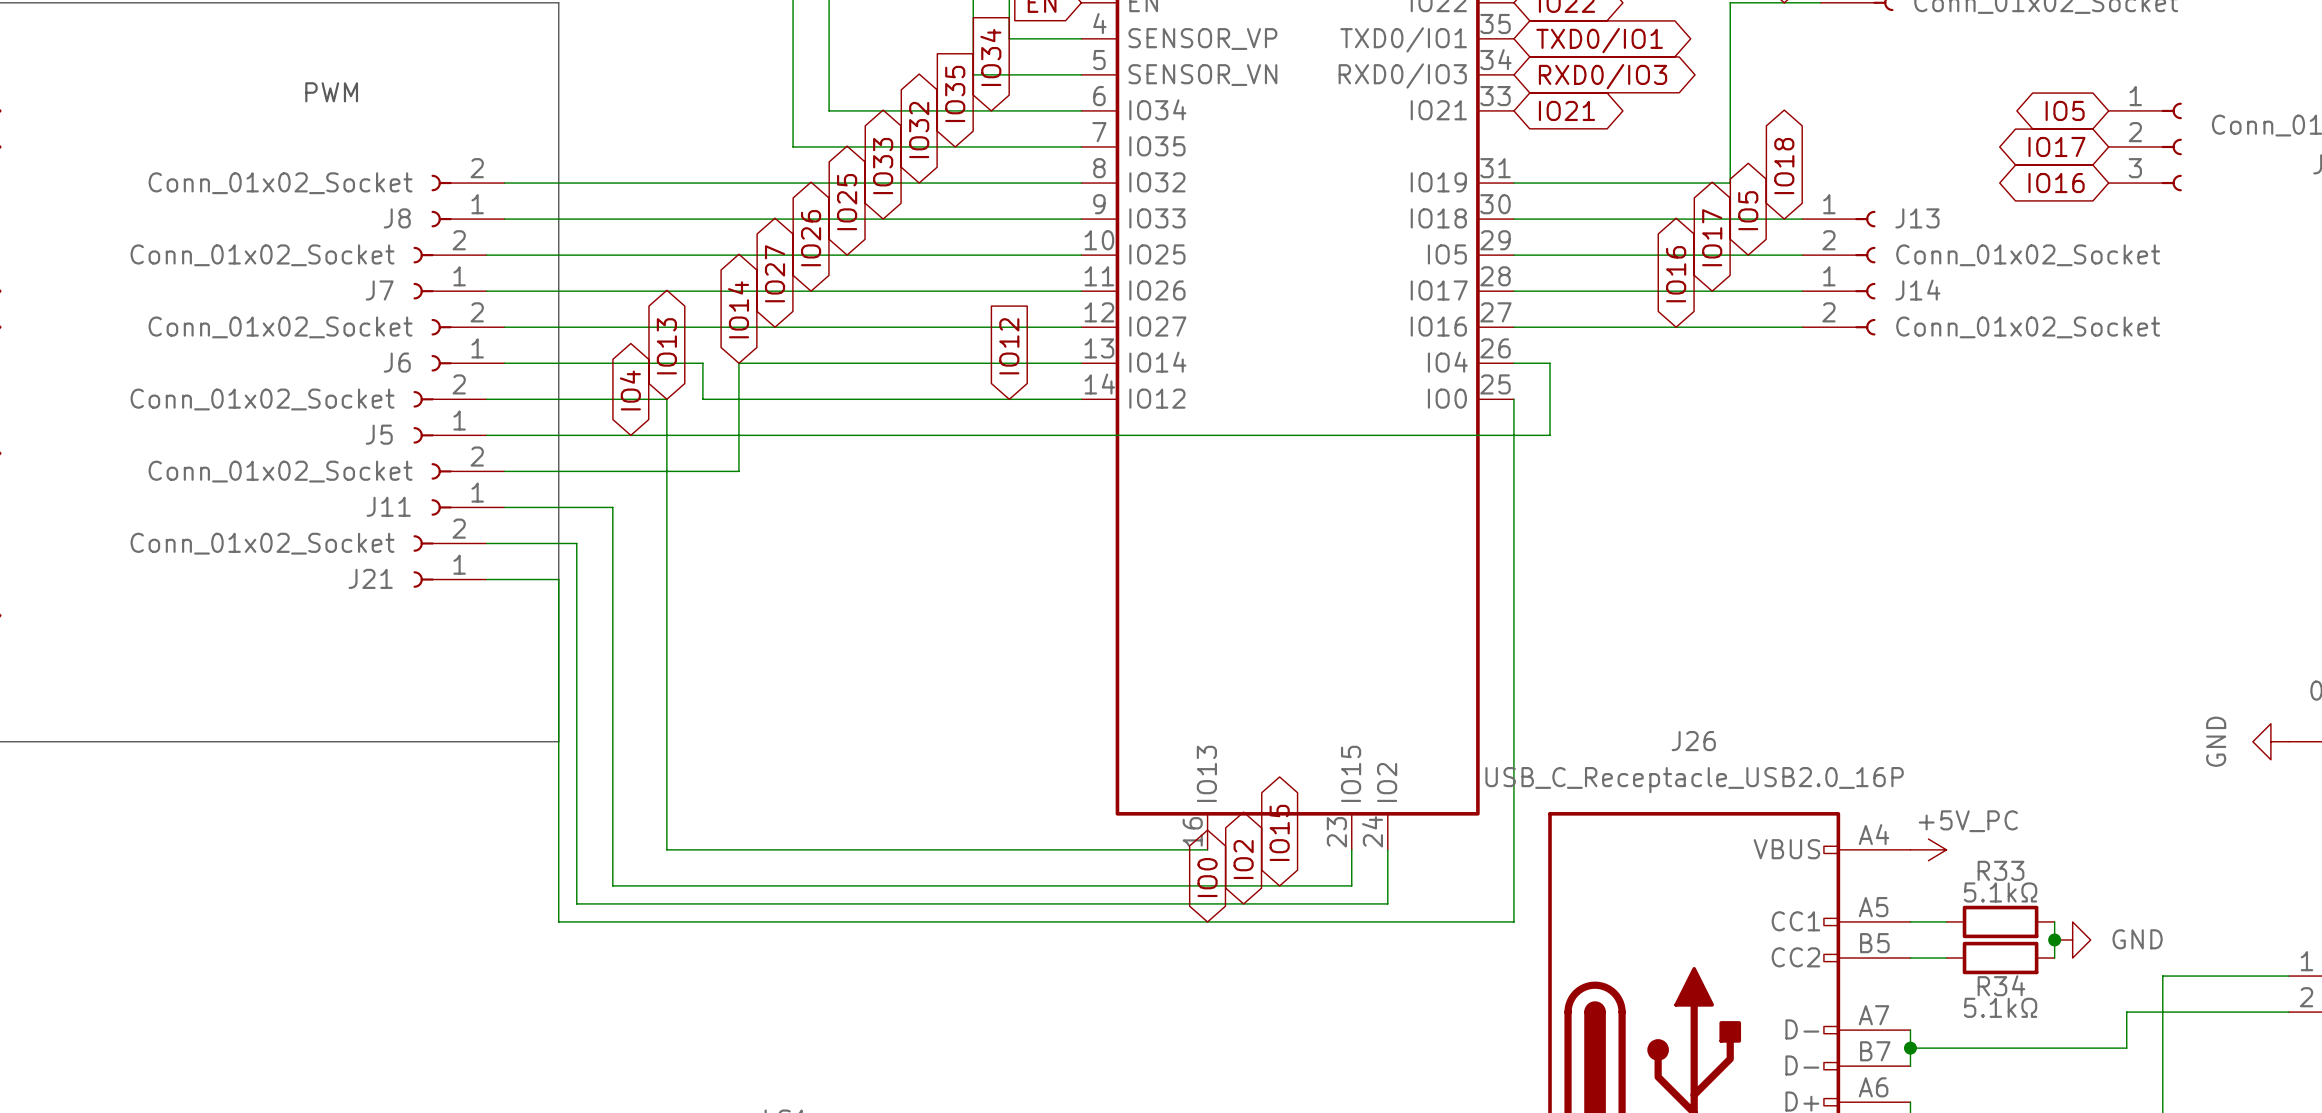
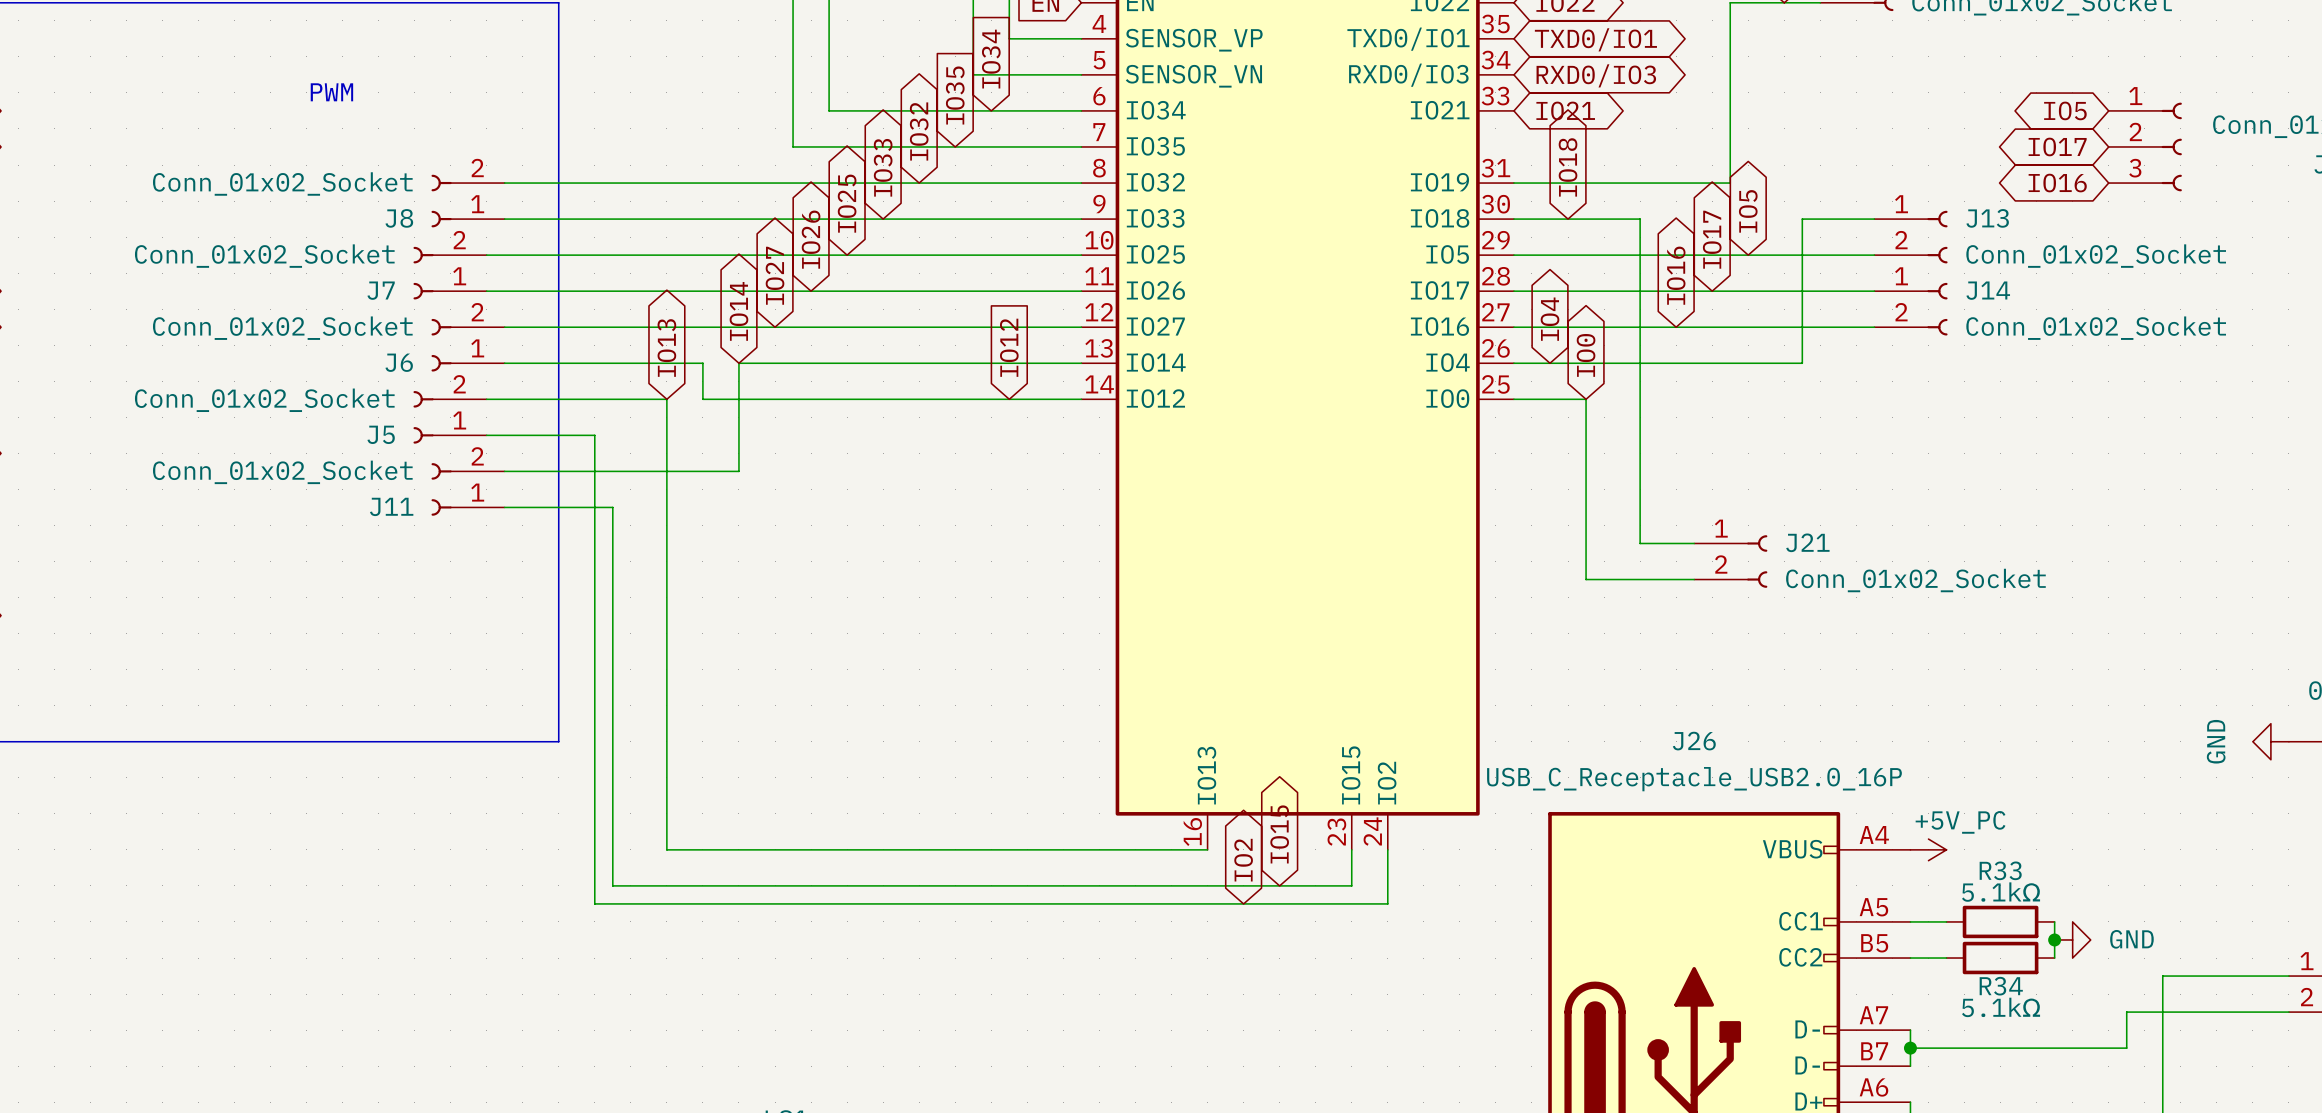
global label position: IO18 (1784, 166) -> IO18 (1568, 167)
wire: (1640, 219) (1802, 219) -> (1640, 219) (1640, 543) (1694, 543)
J13 position: (1838, 237) -> (1910, 237)
J14 position: (1838, 309) -> (1910, 309)
global label: none -> IO4 (1550, 319)
global label: none -> IO0 (1586, 355)
wire: (1550, 363) (1550, 435) (594, 435) -> (1550, 363) (1802, 363) (1802, 219) (1874, 219)
global label: IO4 (630, 390) -> none
wire: (1513, 399) (1513, 921) (558, 921) (558, 579) (486, 579) -> (1513, 399) (1586, 399) (1586, 579) (1694, 579)
wire: (486, 543) (576, 543) (576, 903) (594, 903) -> (594, 435) (594, 903)
J21 rotation: 0° (423, 561) -> 180° (1757, 561)
J21 position: (450, 561) -> (1730, 561)
global label: IO0 (1207, 877) -> none

